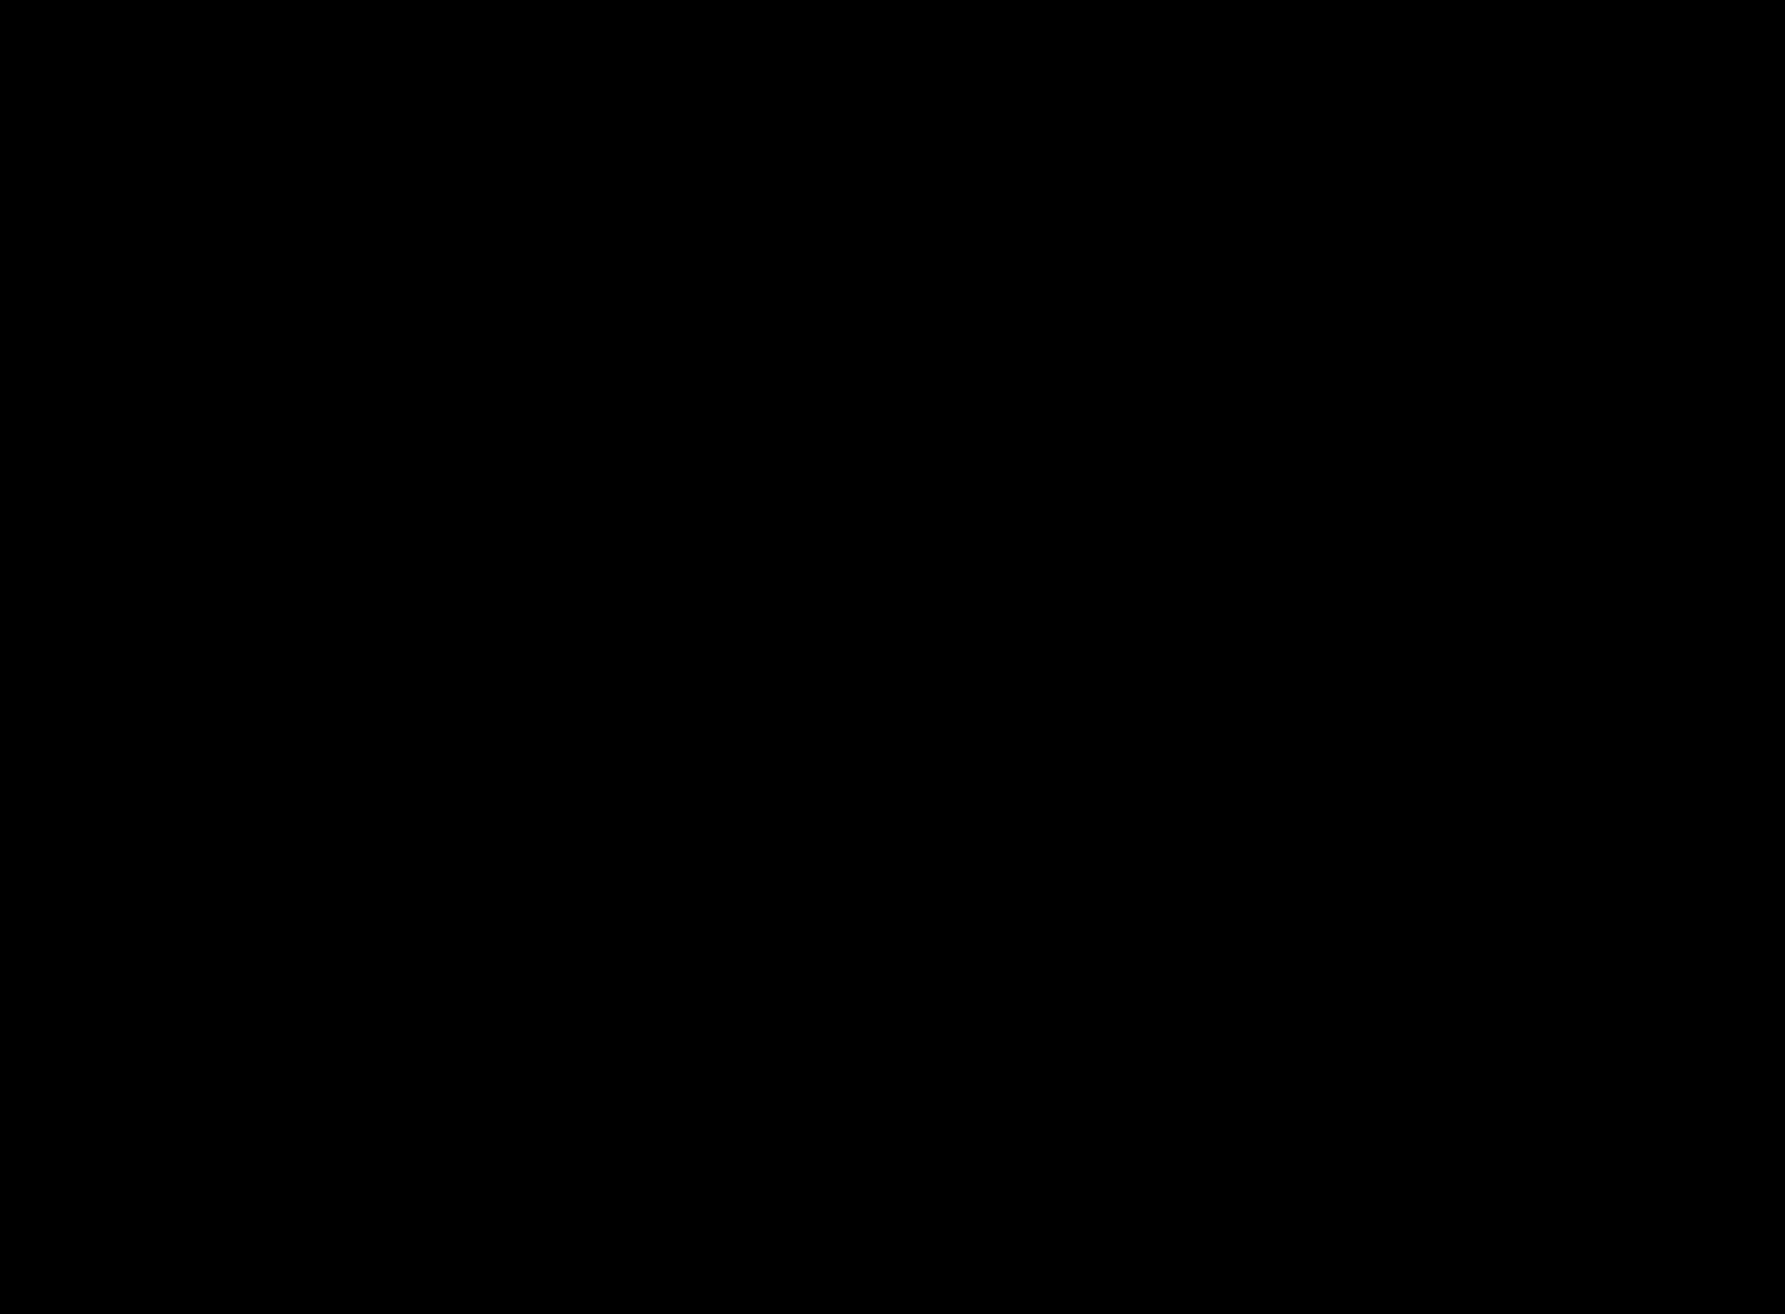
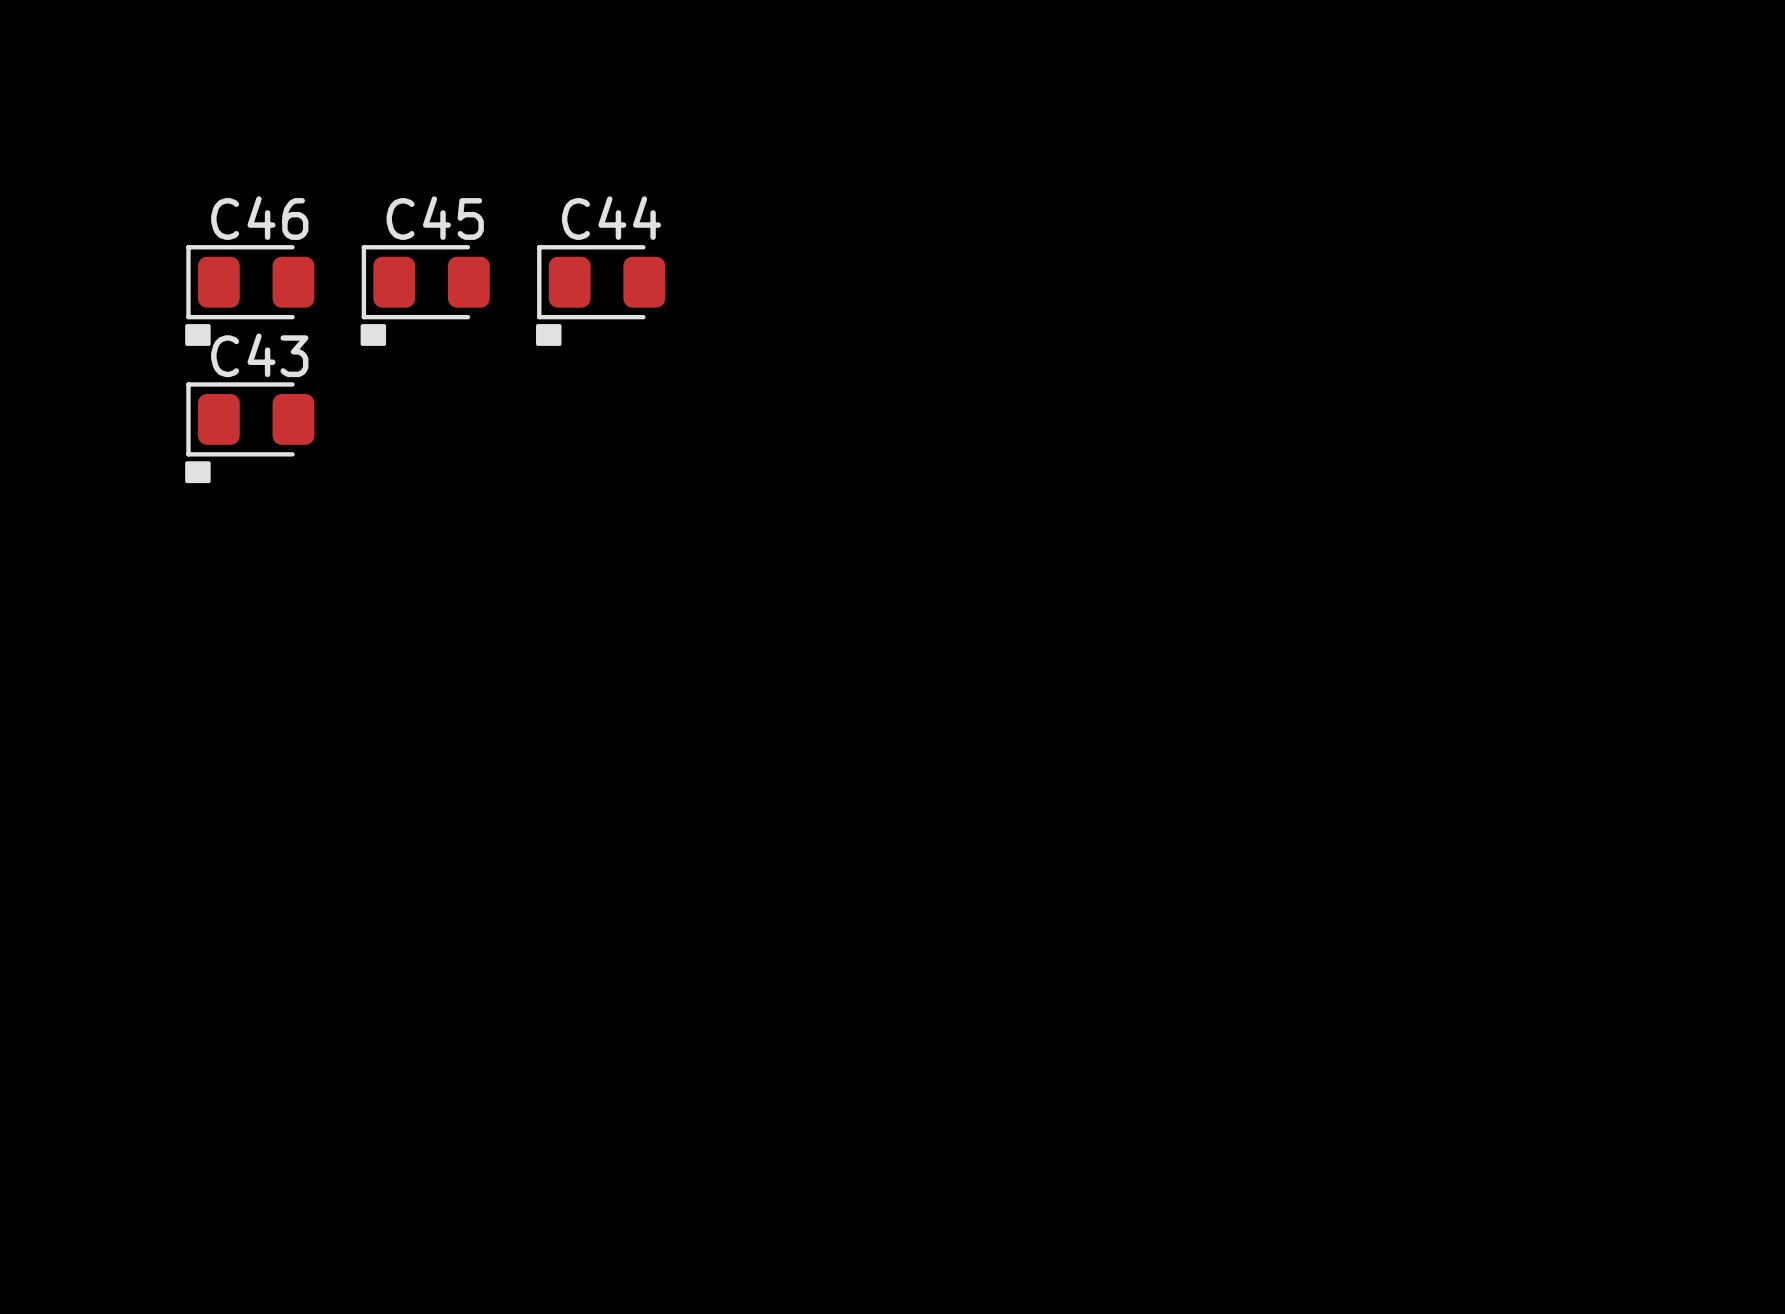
C46: none -> (249, 295)
C45: none -> (425, 295)
C44: none -> (600, 295)
C43: none -> (249, 432)

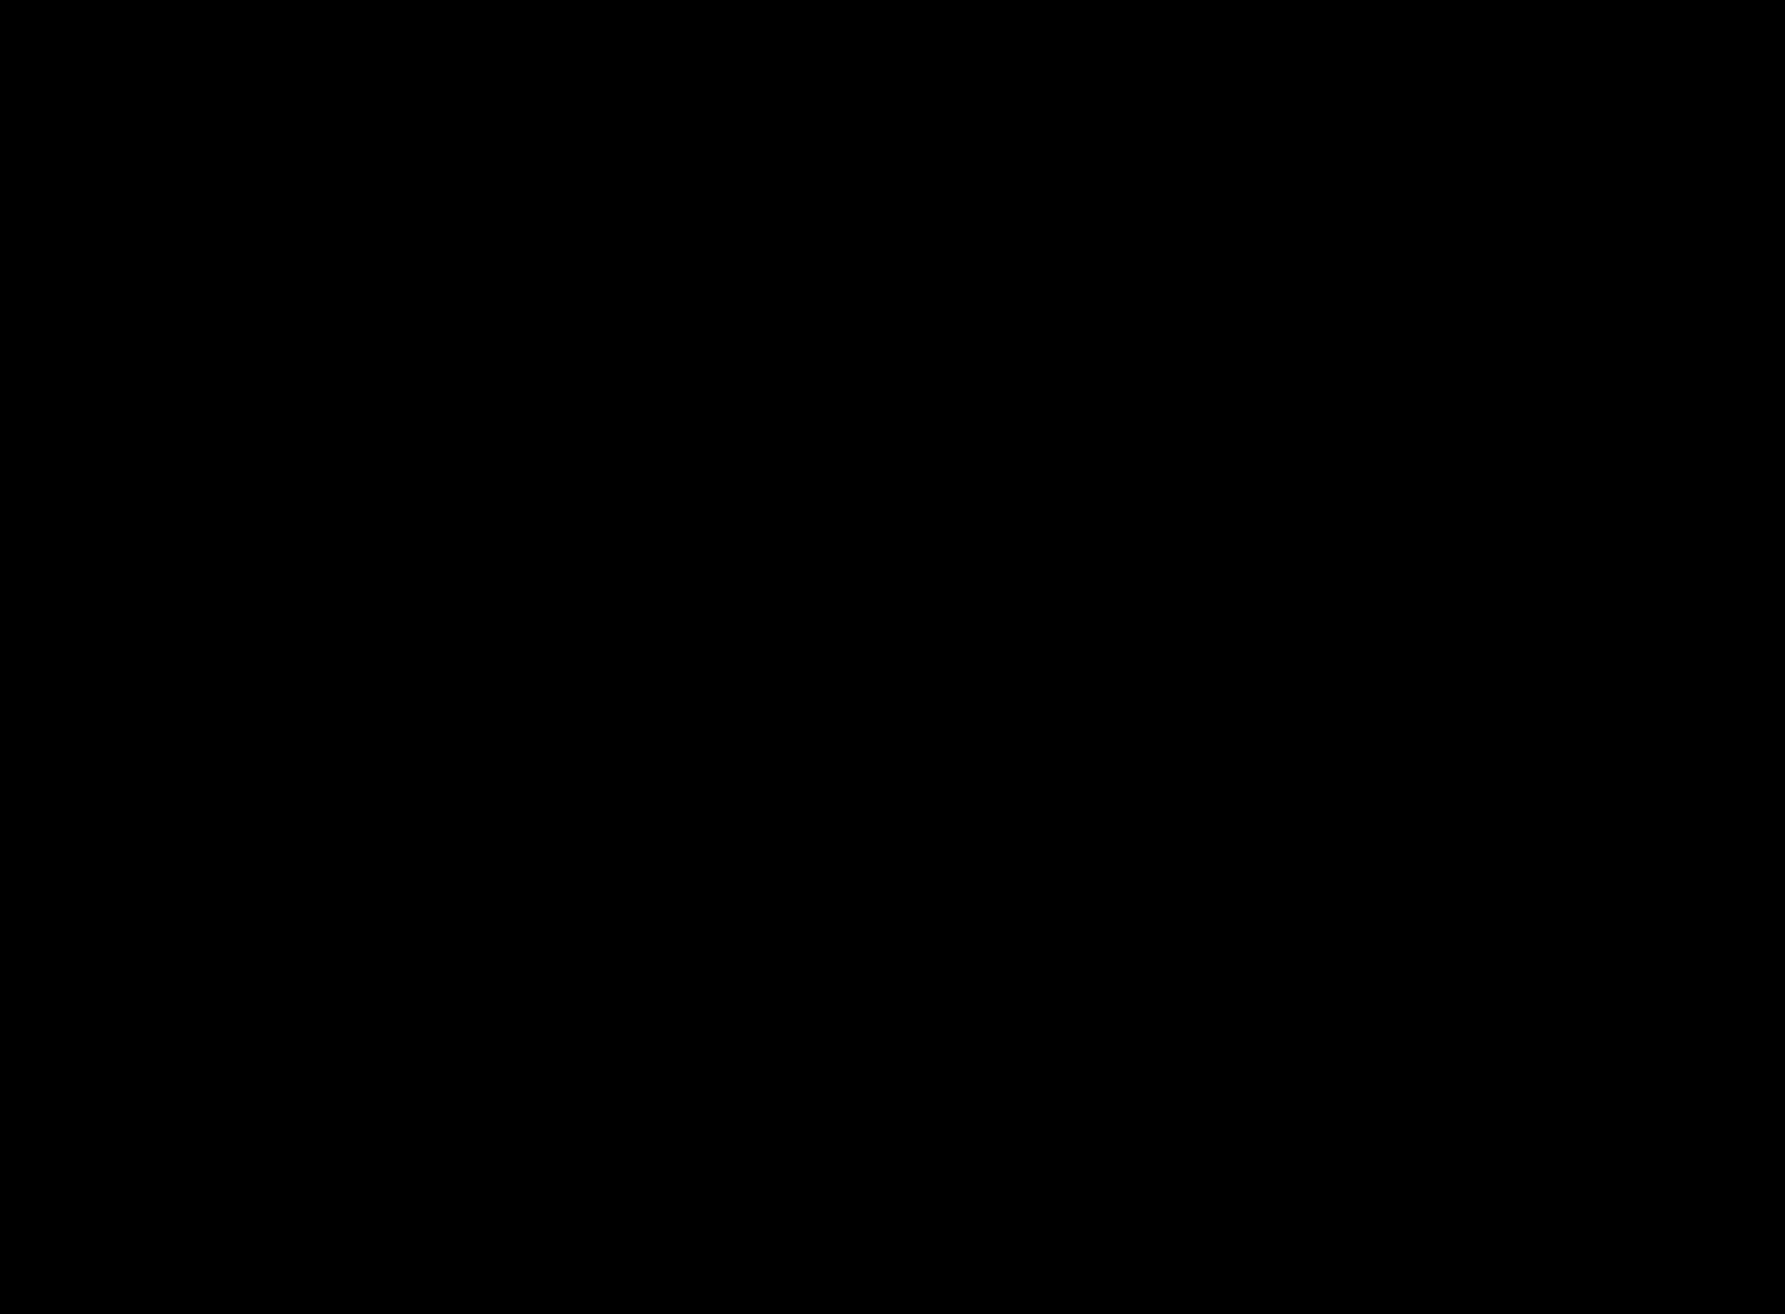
C46: (249, 295) -> none
C45: (425, 295) -> none
C44: (600, 295) -> none
C43: (249, 432) -> none

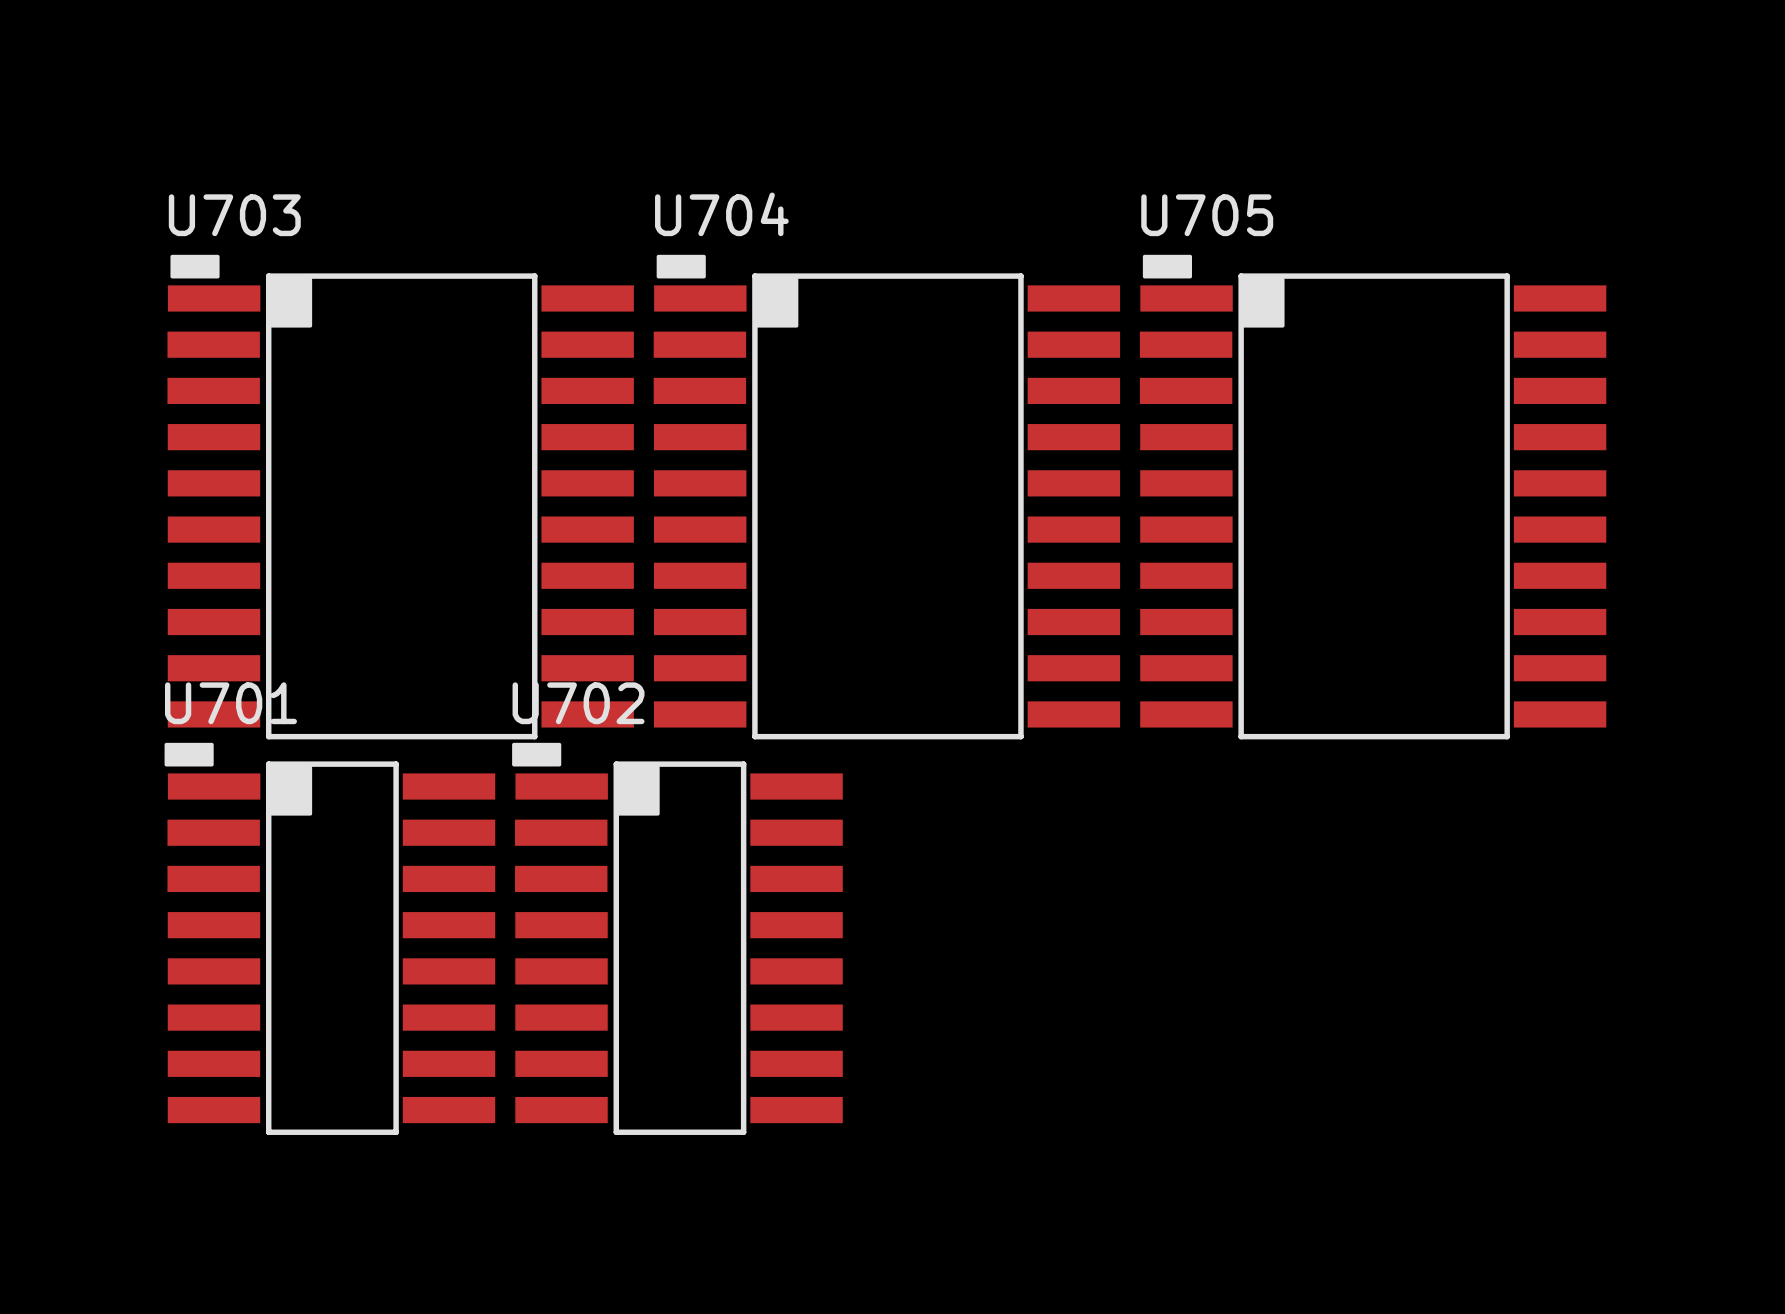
U703: none -> (400, 497)
U704: none -> (886, 497)
U705: none -> (1373, 497)
U701: none -> (329, 938)
U702: none -> (677, 938)

